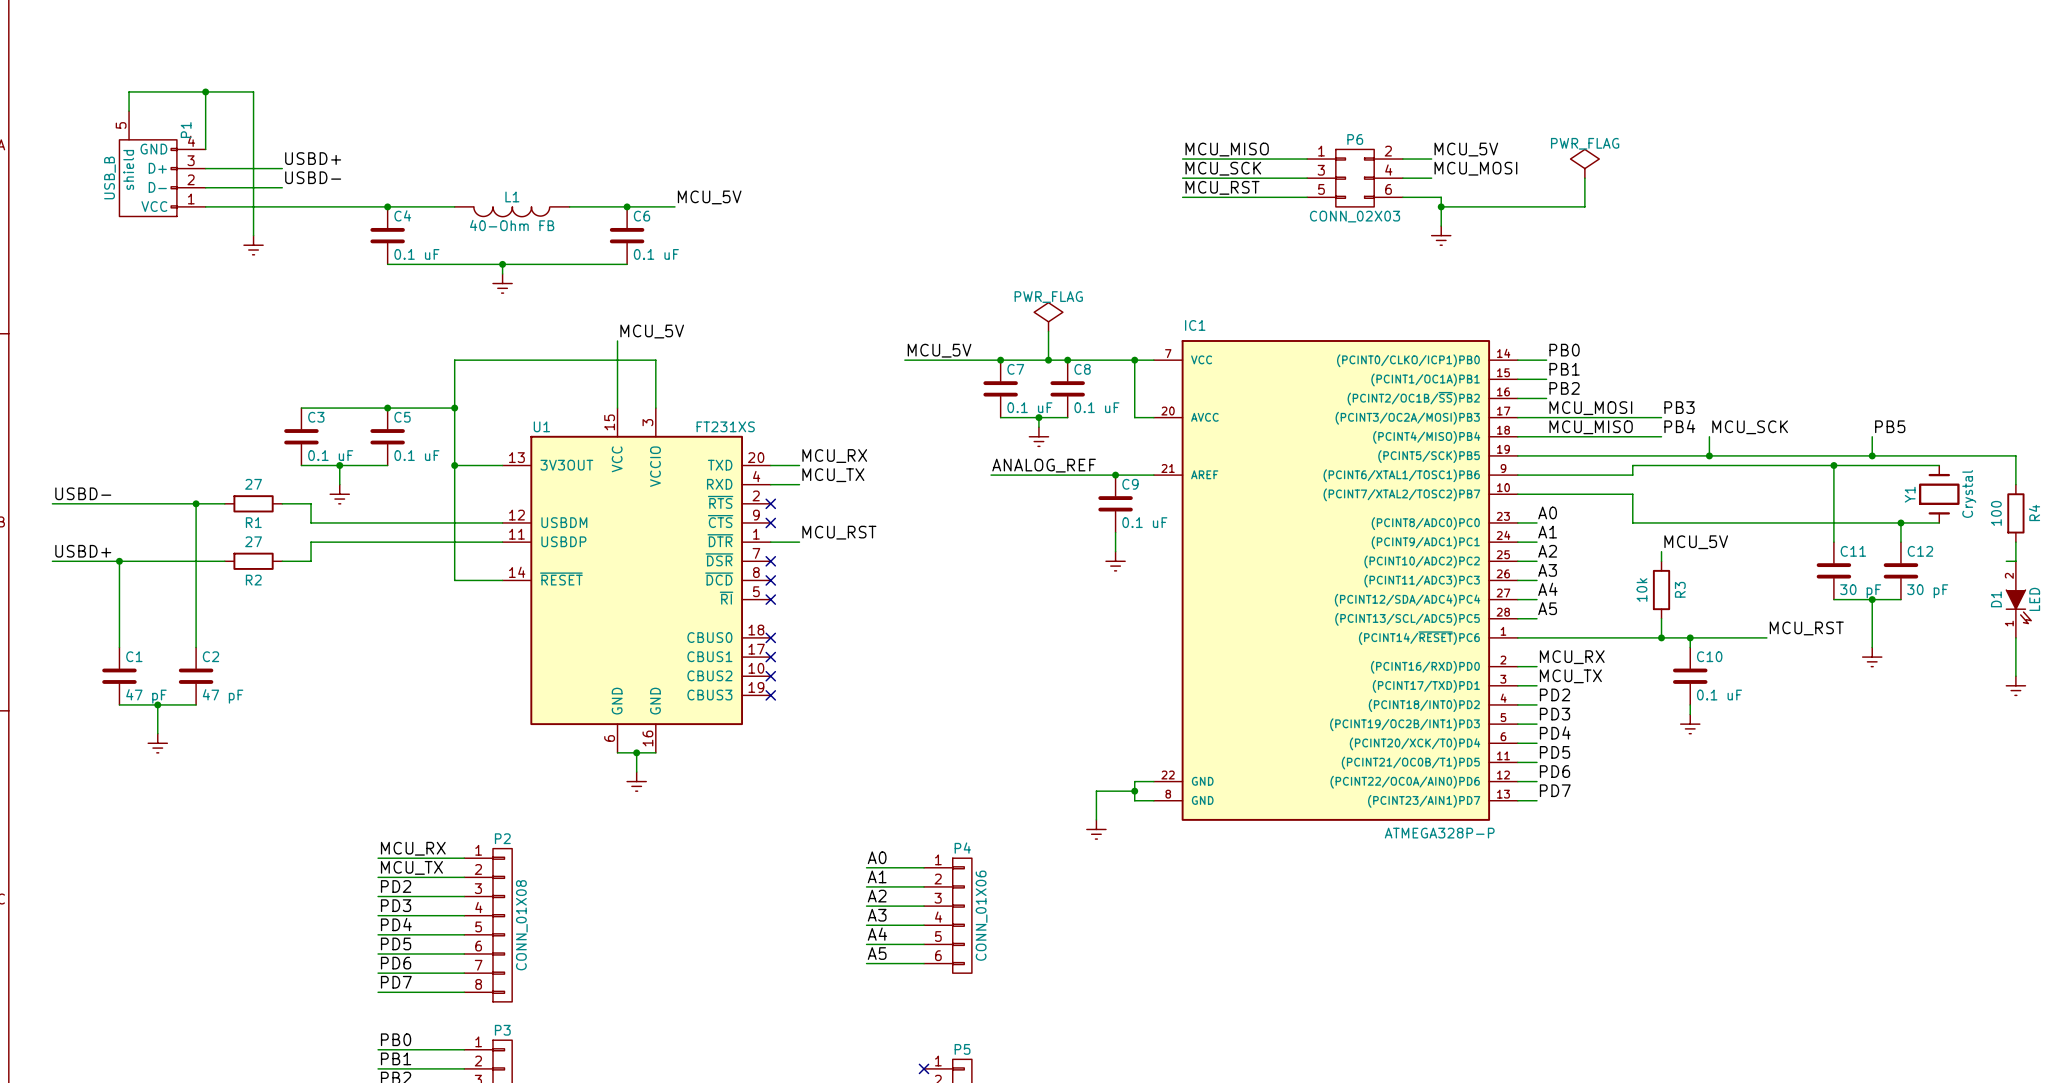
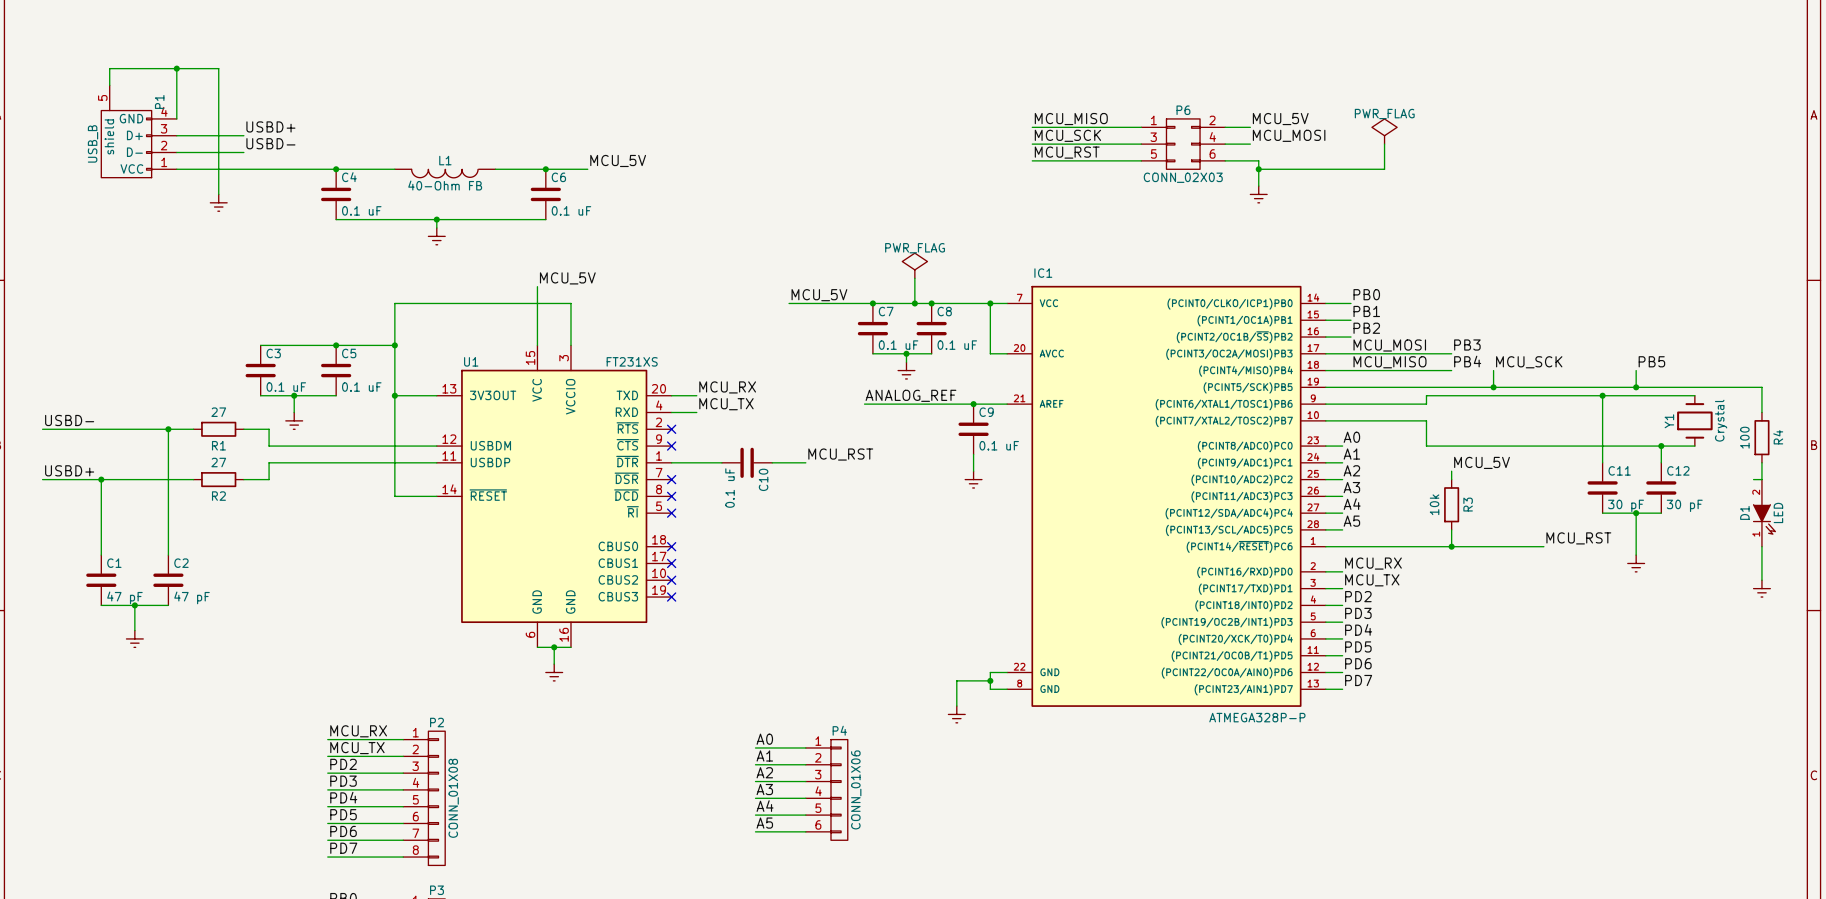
label position: MCU_RST (839, 532) -> MCU_RST (840, 454)
wire: none -> (696, 462) (721, 462)
wire: none -> (772, 462) (805, 462)
wire: (1690, 637) (1690, 647) -> none
junction: (1690, 637) -> none
C10 rotation: 0° (1690, 676) -> 90° clockwise (747, 462)
C10 position: (1690, 676) -> (747, 462)
wire: (1690, 704) (1690, 714) -> none
power symbol: (1690, 724) -> none

